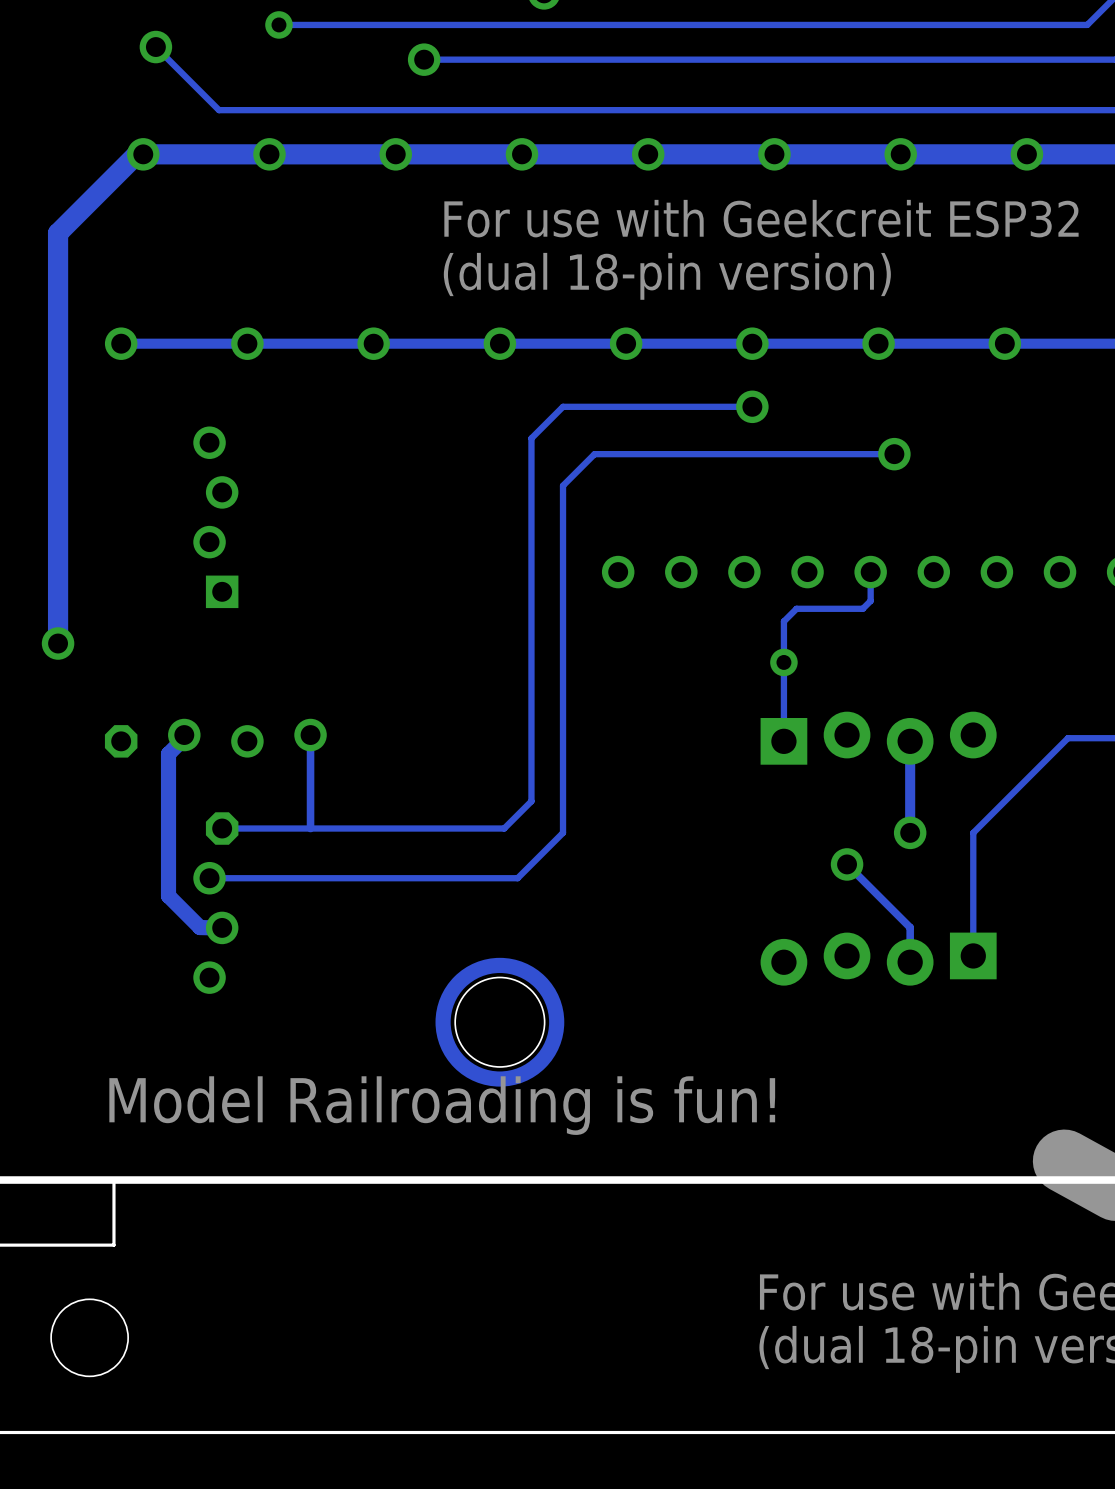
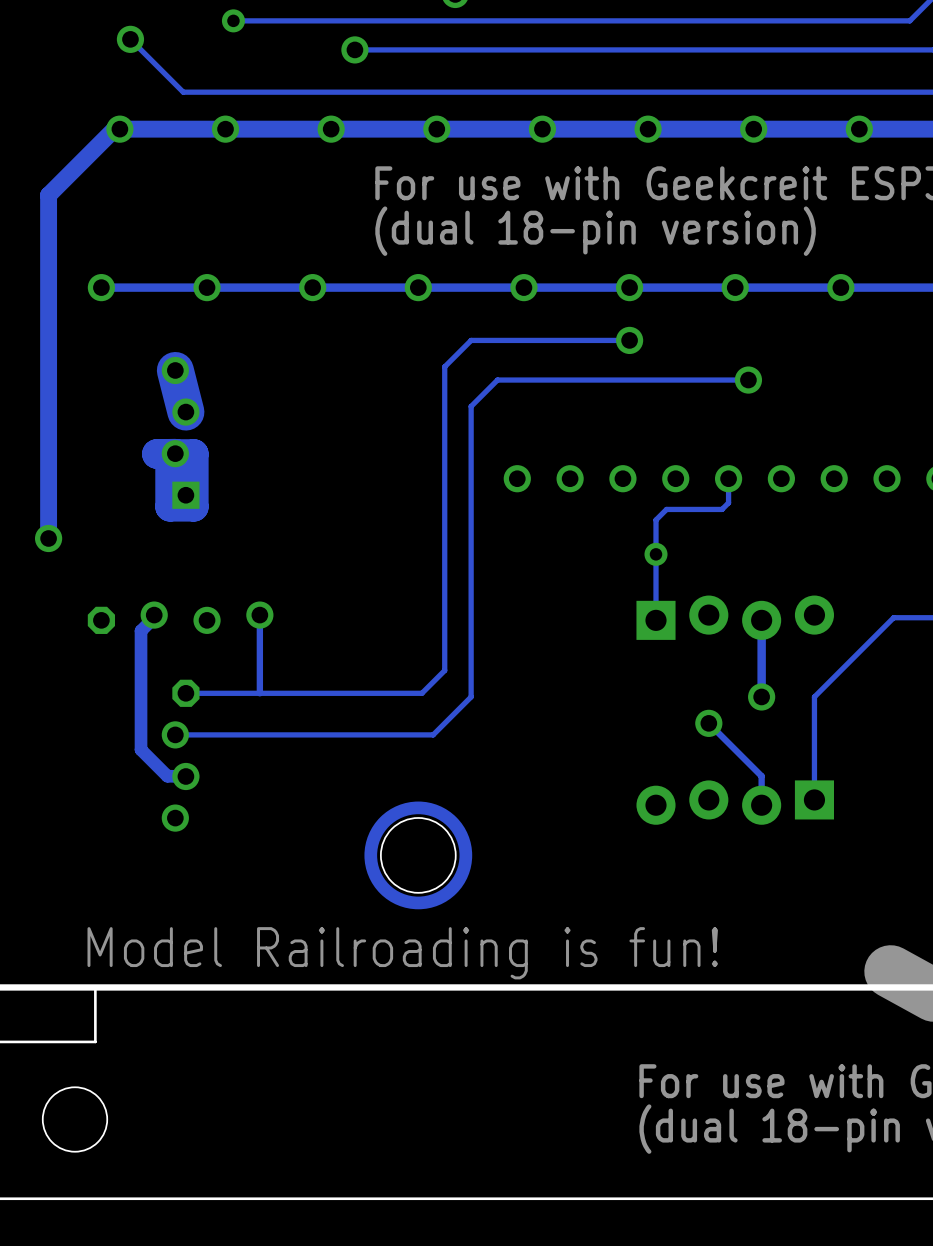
track: none -> (175, 370) (185, 412)
track: none -> (175, 453) (156, 453) (193, 453) (193, 506) (170, 506) (170, 467)
text position: Model Railroading is fun! (442, 1105) -> Model Railroading is fun! (402, 953)

